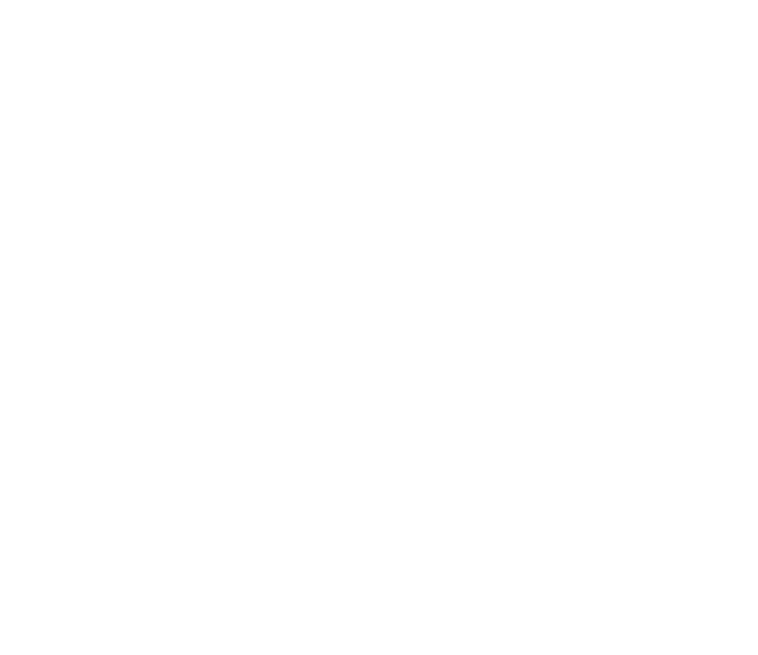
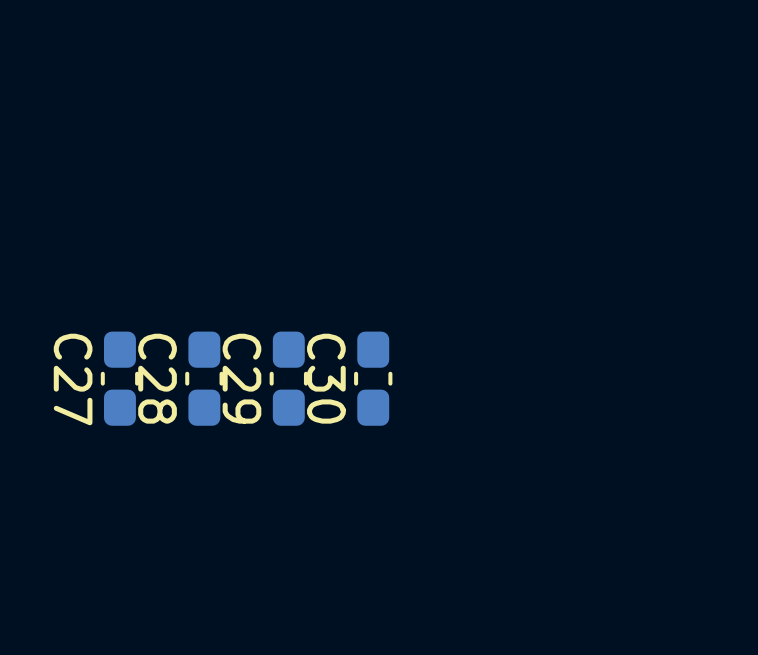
C27: none -> (119, 378)
C28: none -> (204, 378)
C29: none -> (288, 378)
C30: none -> (373, 378)

